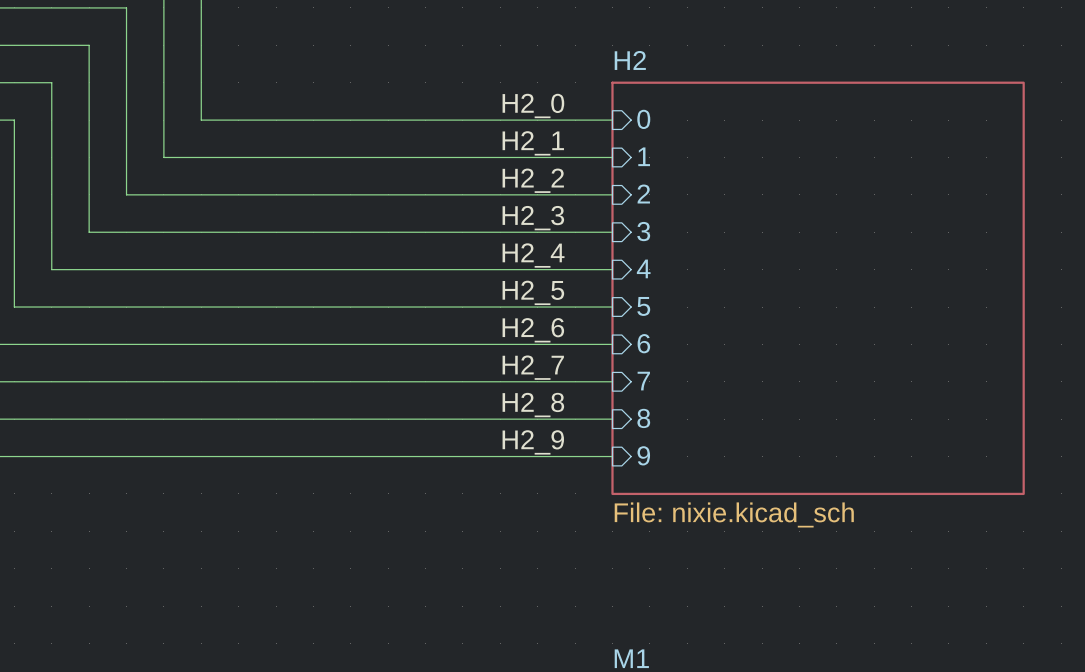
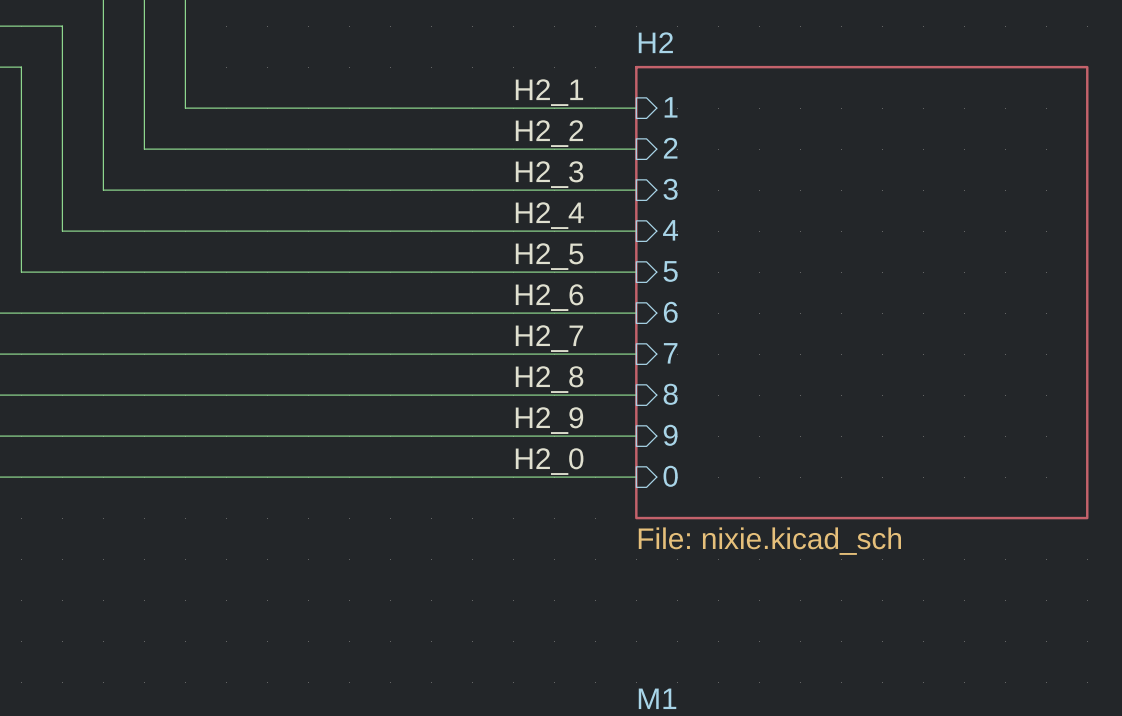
label: H2_0 (533, 105) -> H2_1 (549, 92)
sheet pin: 0 (643, 119) -> 1 (671, 107)
label: H2_1 (533, 143) -> H2_2 (549, 133)
sheet pin: 1 (644, 156) -> 2 (670, 148)
label: H2_2 (533, 180) -> H2_3 (549, 174)
sheet pin: 2 (643, 194) -> 3 (670, 189)
label: H2_3 (533, 218) -> H2_4 (549, 215)
sheet pin: 3 (643, 231) -> 4 (670, 230)
label: H2_4 (533, 255) -> H2_5 (549, 256)
sheet pin: 4 (643, 268) -> 5 (670, 271)
label: H2_5 (533, 292) -> H2_6 (549, 297)
sheet pin: 5 (643, 306) -> 6 (670, 312)
label: H2_6 (533, 330) -> H2_7 (549, 338)
sheet pin: 6 (643, 343) -> 7 (670, 353)
label: H2_7 (533, 367) -> H2_8 (549, 379)
sheet pin: 7 (643, 381) -> 8 (670, 394)
label: H2_8 (533, 405) -> H2_9 (549, 420)
sheet pin: 8 (643, 418) -> 9 (670, 435)
label: H2_9 (533, 442) -> H2_0 (549, 461)
sheet pin: 9 (643, 455) -> 0 (670, 476)

